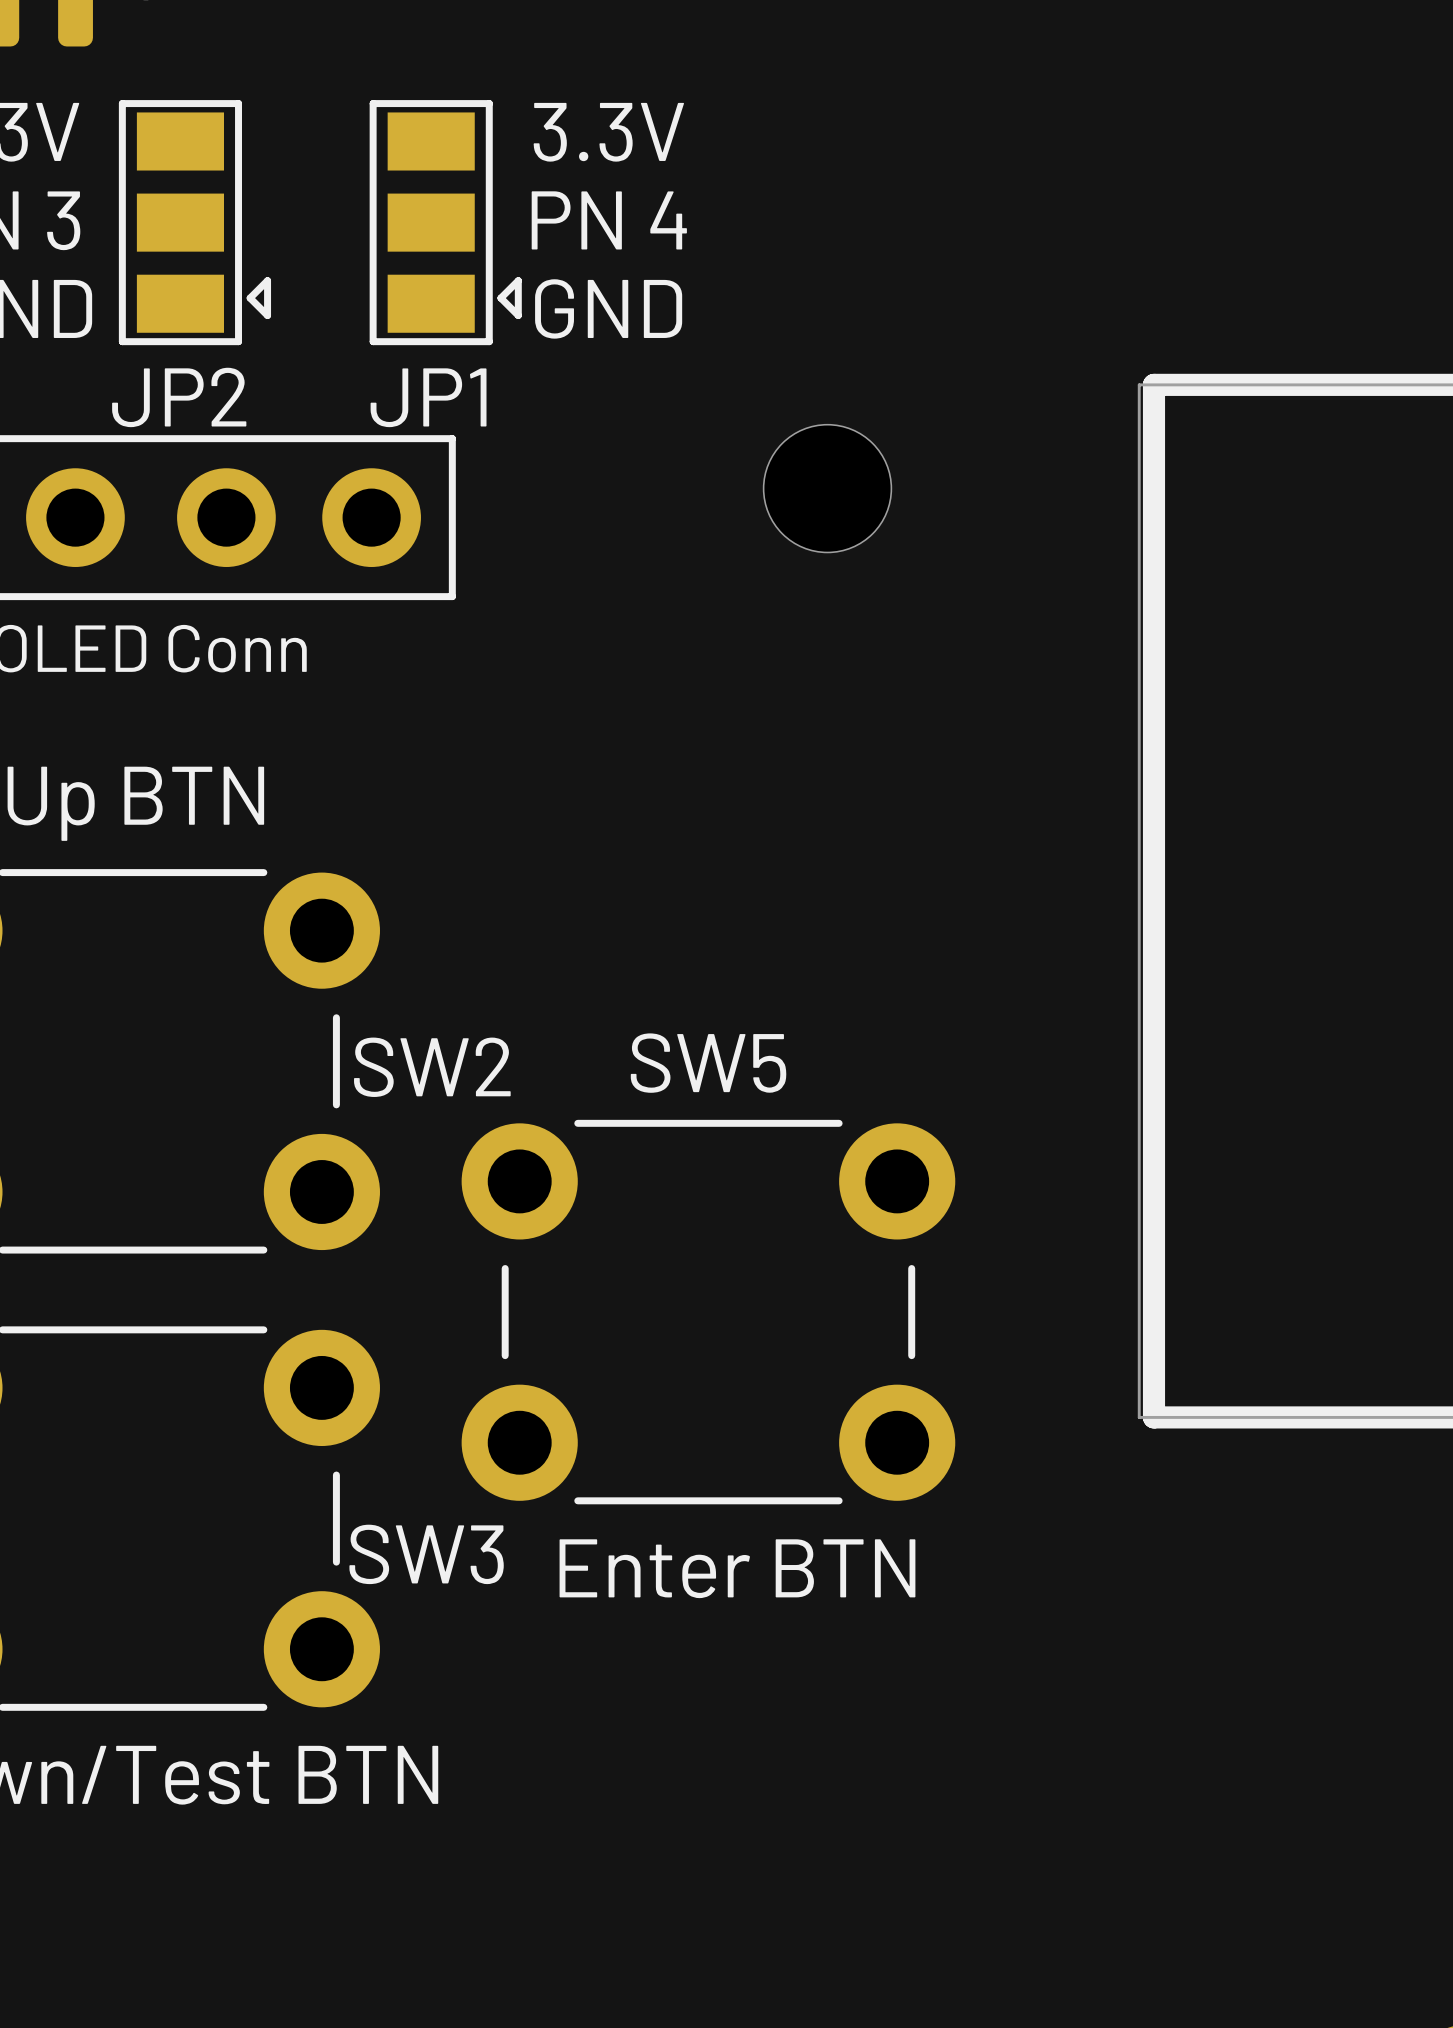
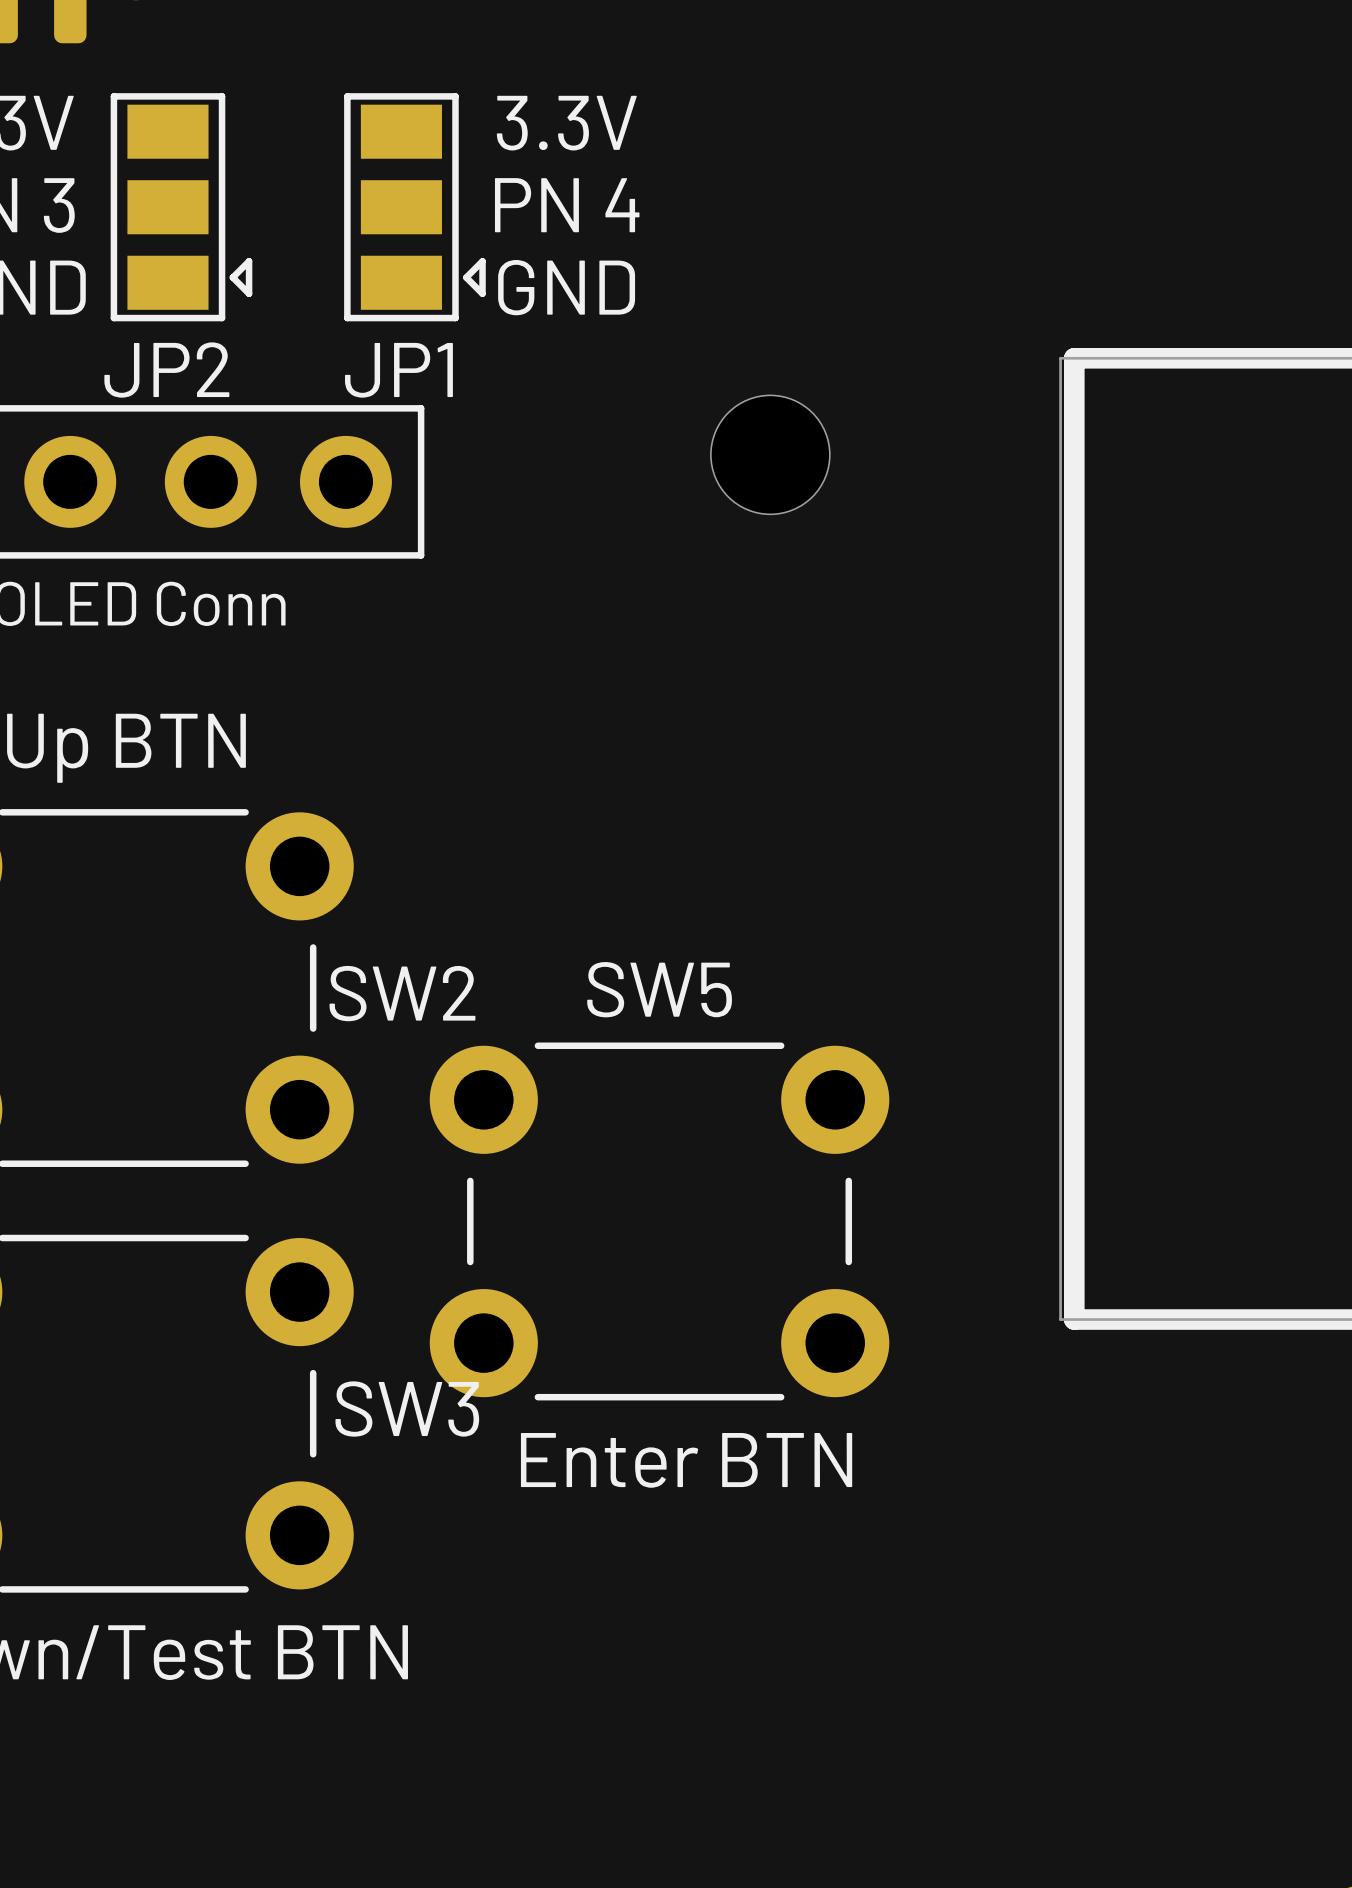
SW3 name position: SW3 (426, 1554) -> SW3 (407, 1408)

